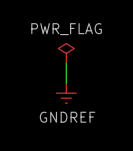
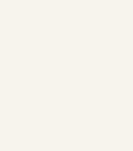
power symbol: PWR_FLAG (66, 53) -> none
wire: (66, 63) (66, 83) -> none
power symbol: GNDREF (66, 93) -> none

